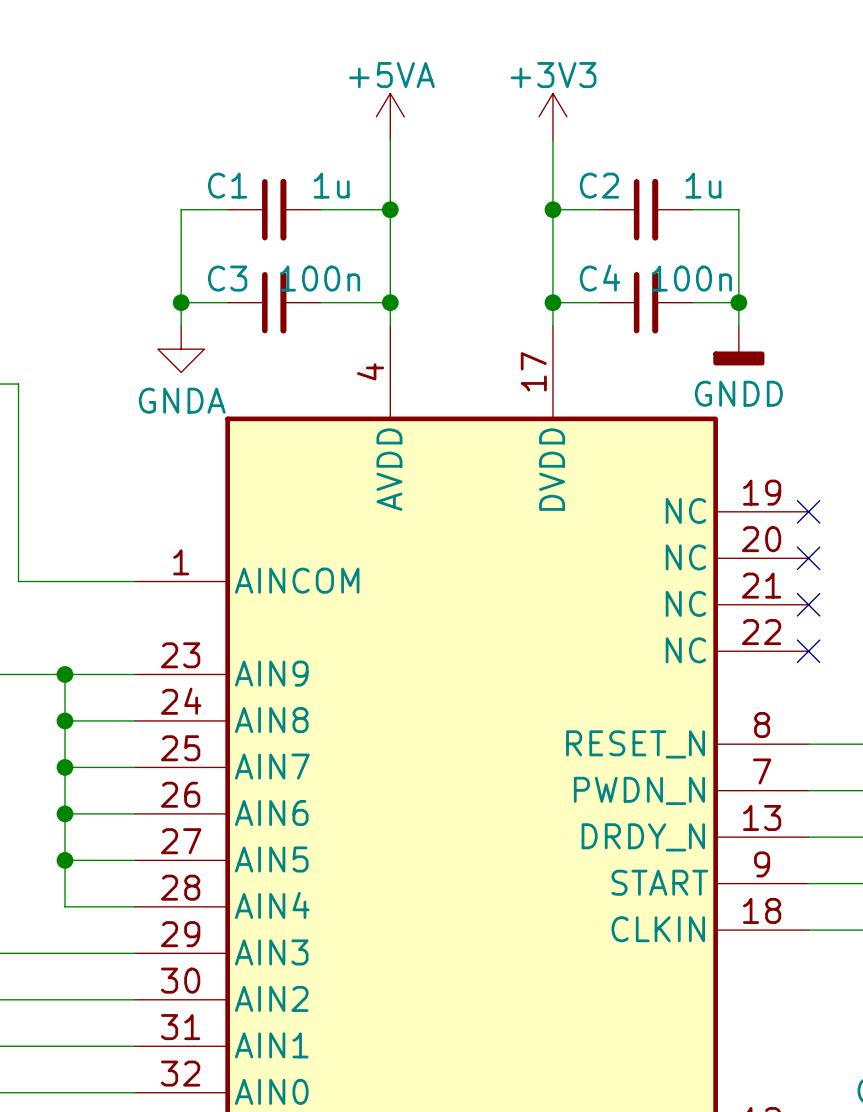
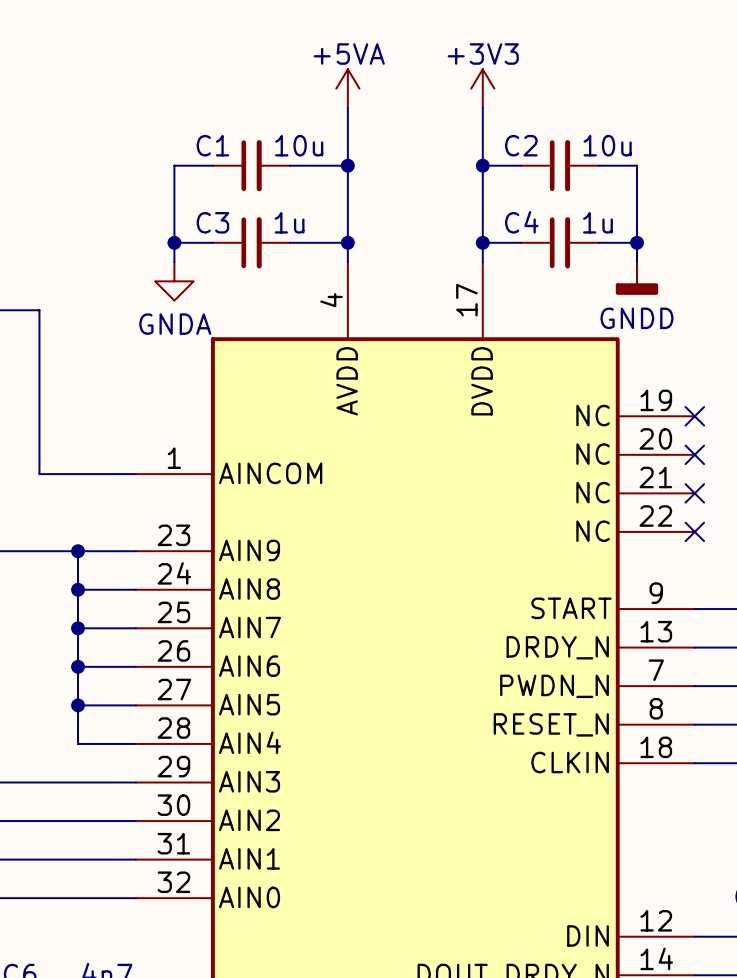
C1 value: 1u (331, 185) -> 10u (299, 145)
C2 value: 1u (703, 185) -> 10u (607, 145)
C3 value: 100n (320, 278) -> 1u (289, 222)
C4 value: 100n (691, 278) -> 1u (597, 222)
part pin number: 8 (762, 725) -> 9 (656, 593)
part pin name: RESET_N (635, 744) -> START (571, 608)
part pin number: 7 (762, 771) -> 13 (656, 631)
part pin name: PWDN_N (639, 790) -> DRDY_N (557, 647)
part pin number: 13 (762, 817) -> 7 (656, 670)
part pin name: DRDY_N (643, 837) -> PWDN_N (554, 686)
part pin number: 9 (762, 864) -> 8 (656, 708)
part pin name: START (659, 882) -> RESET_N (551, 724)

